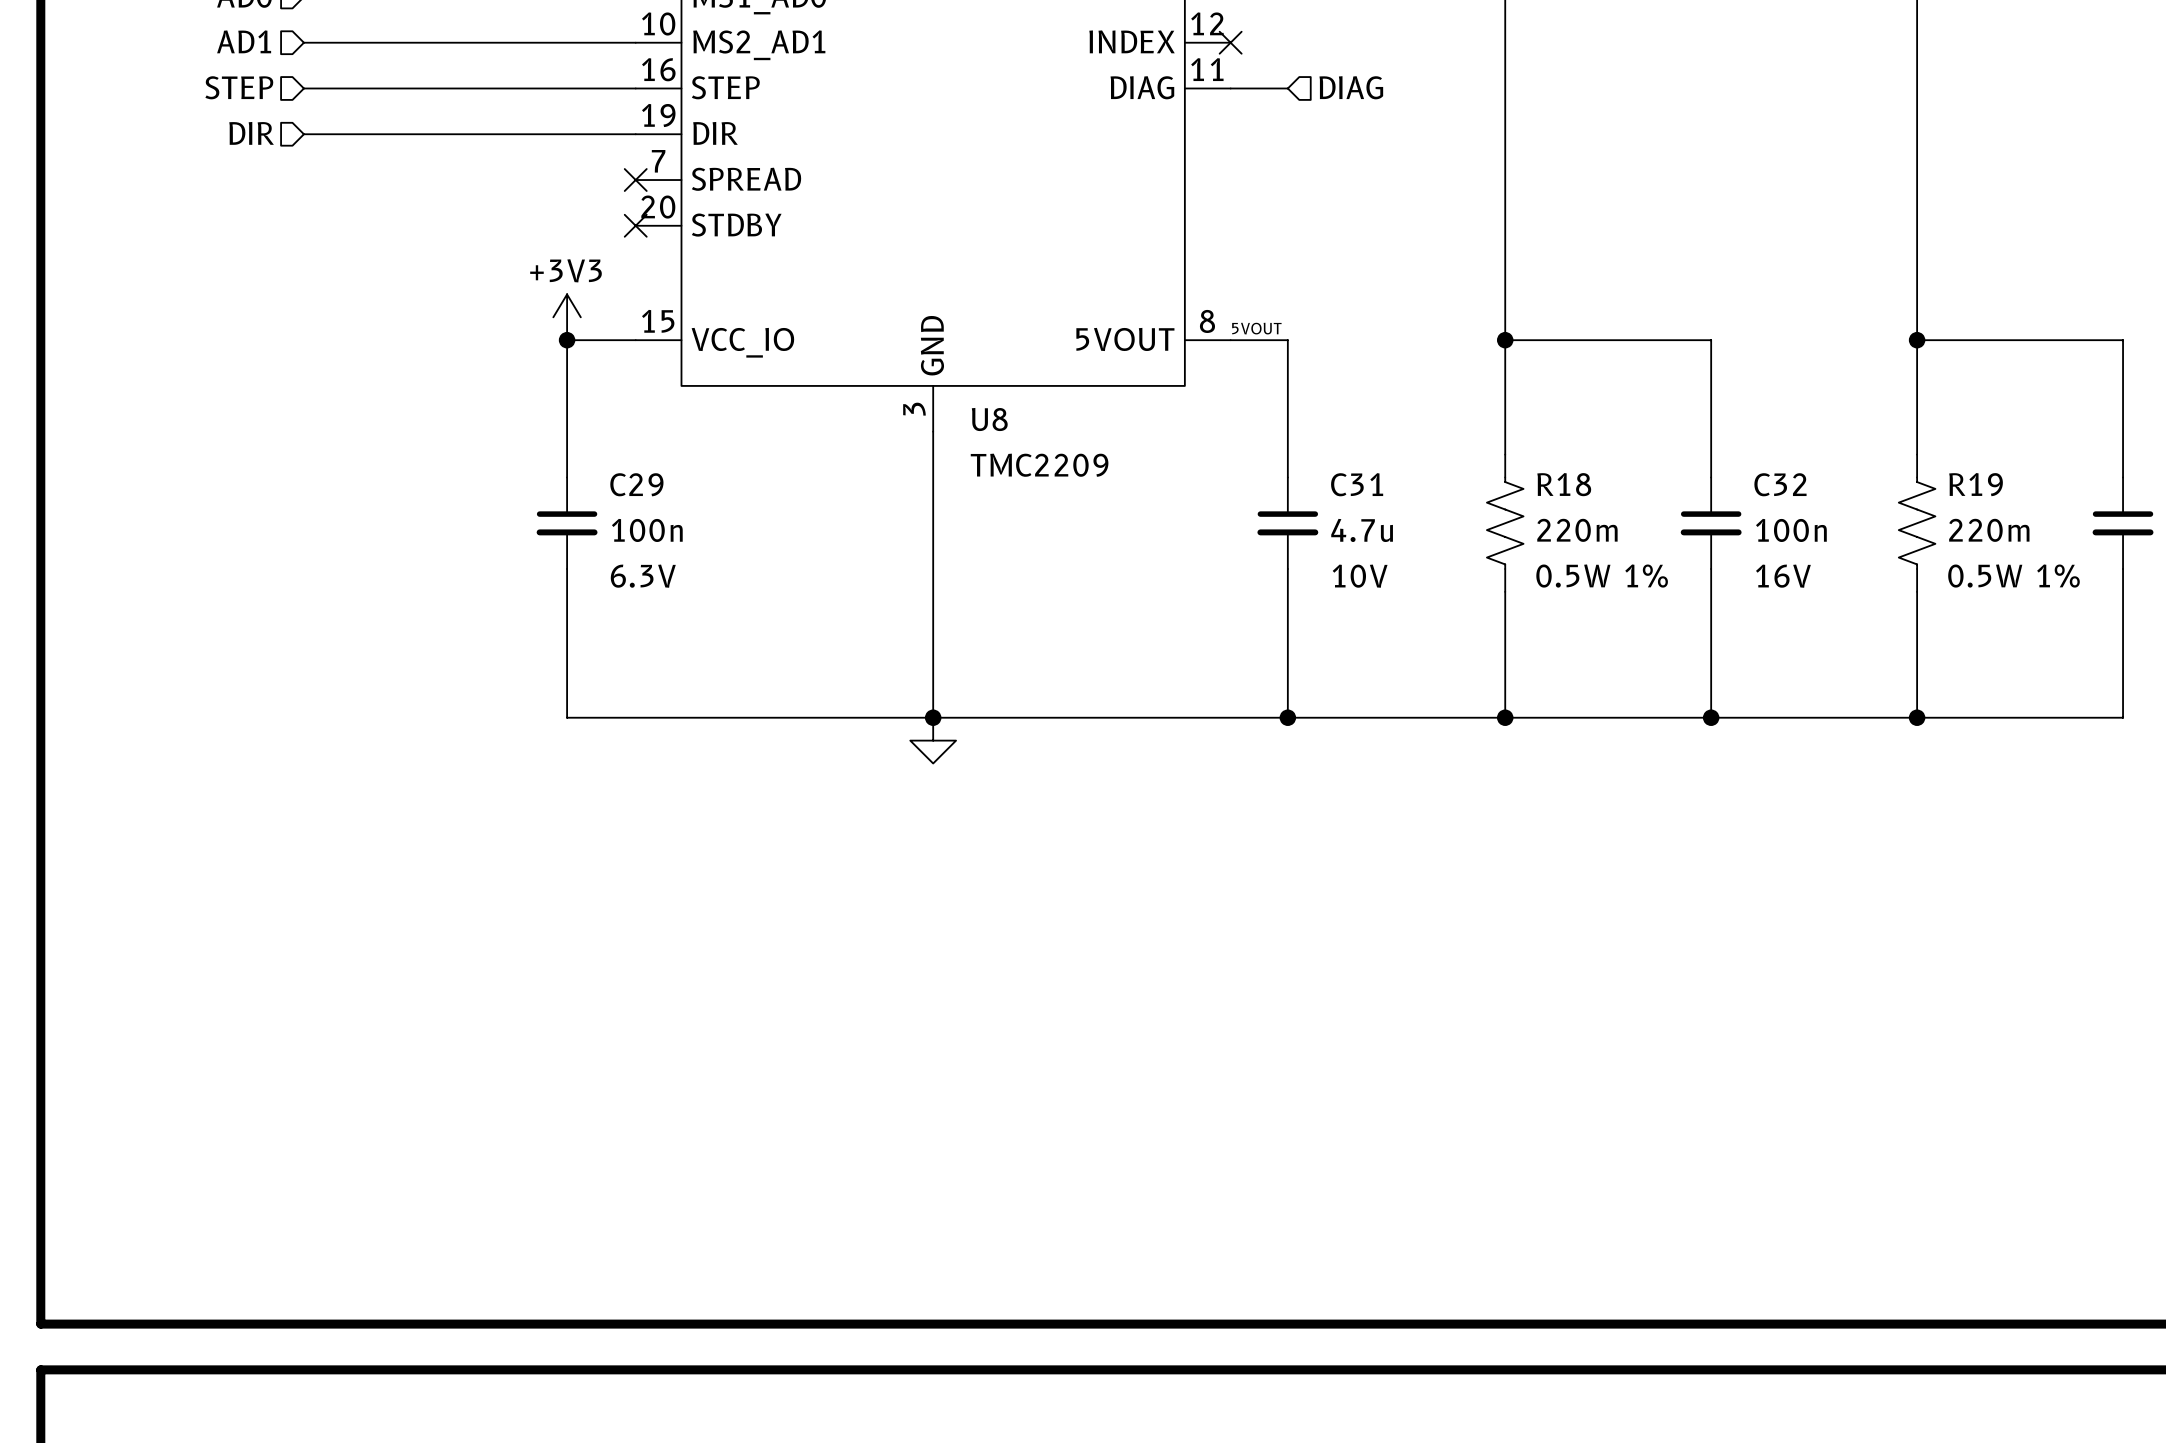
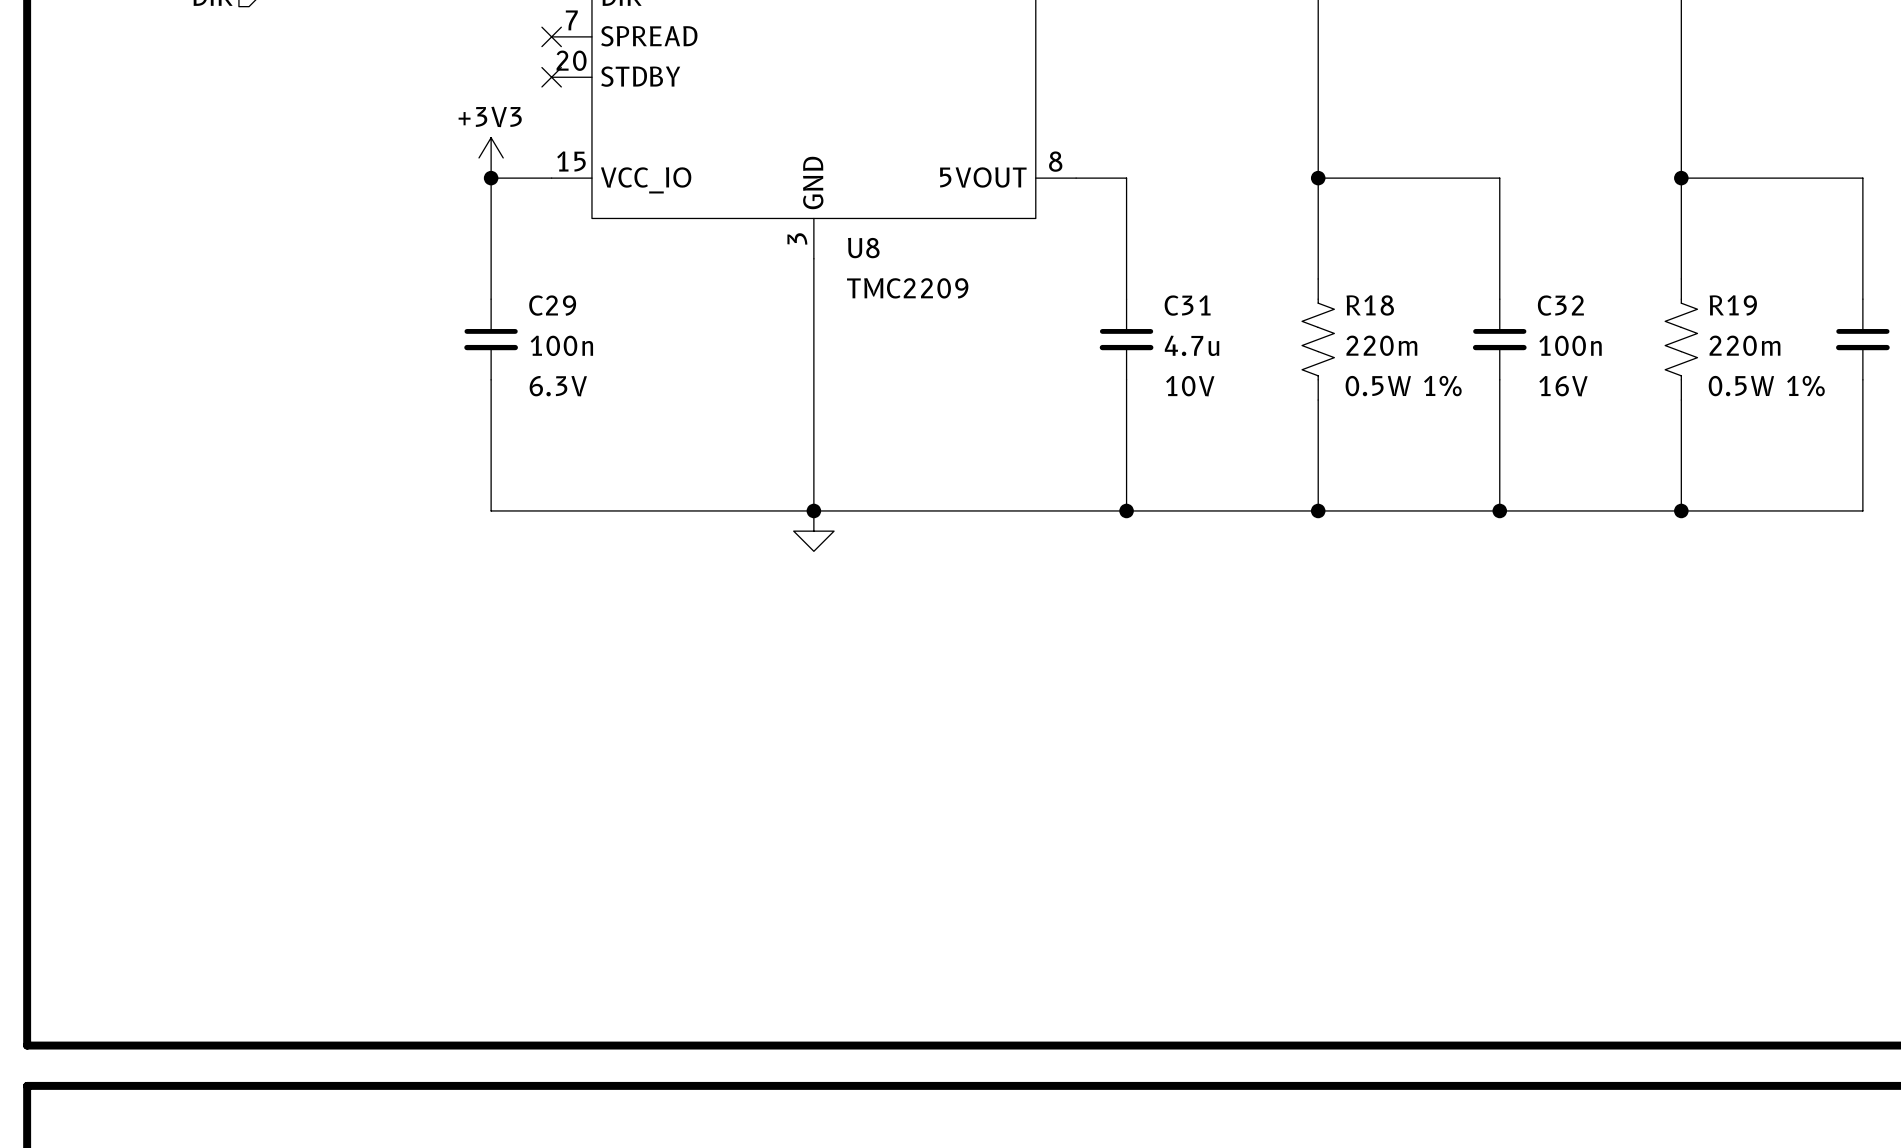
label: 5VOUT (1256, 328) -> none

